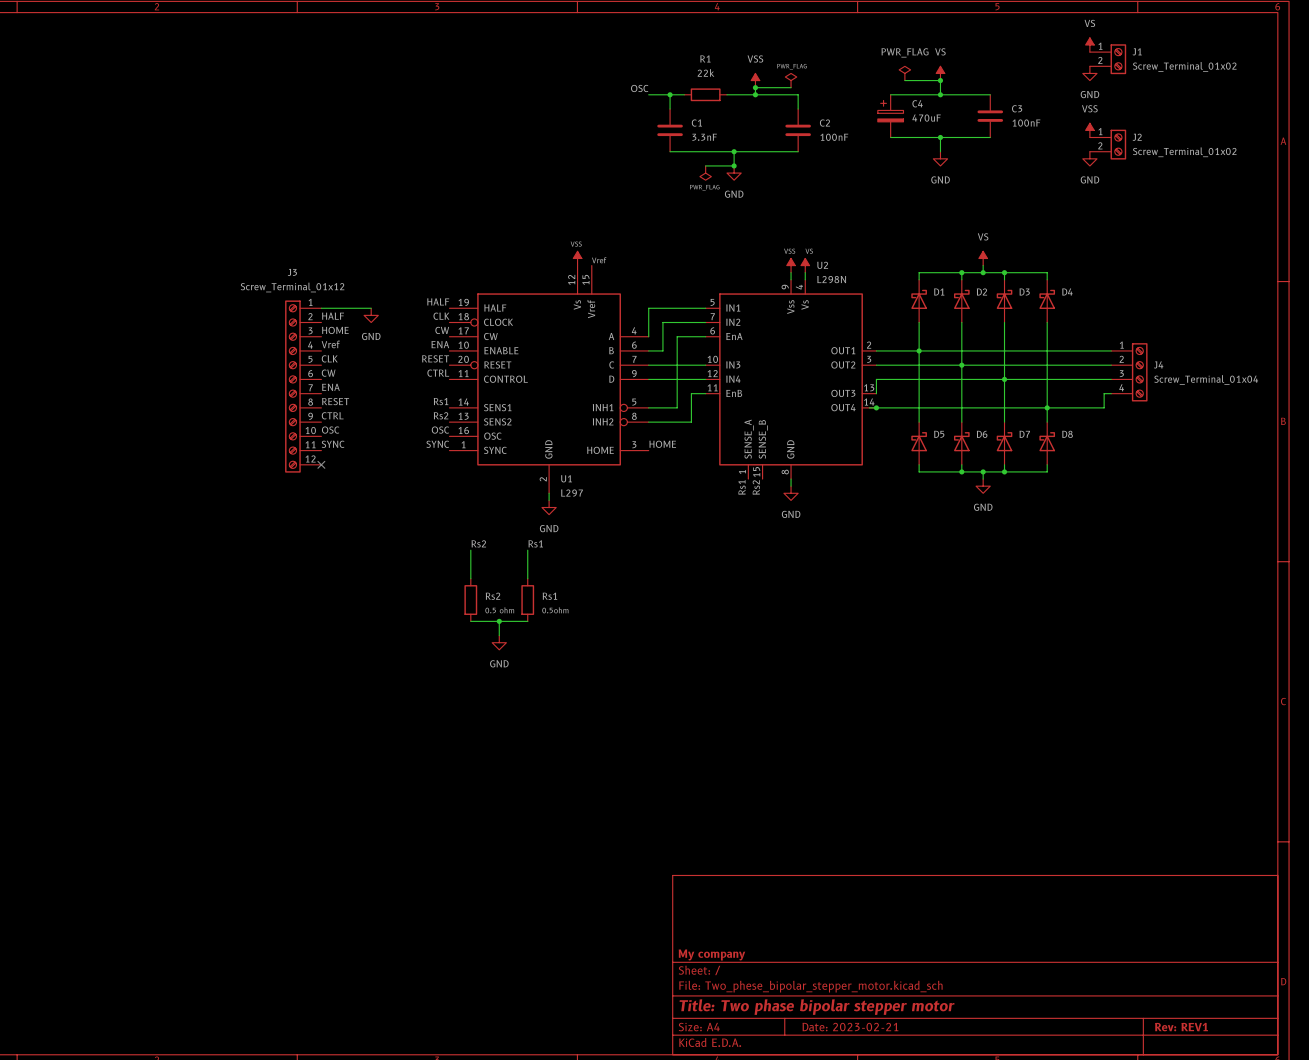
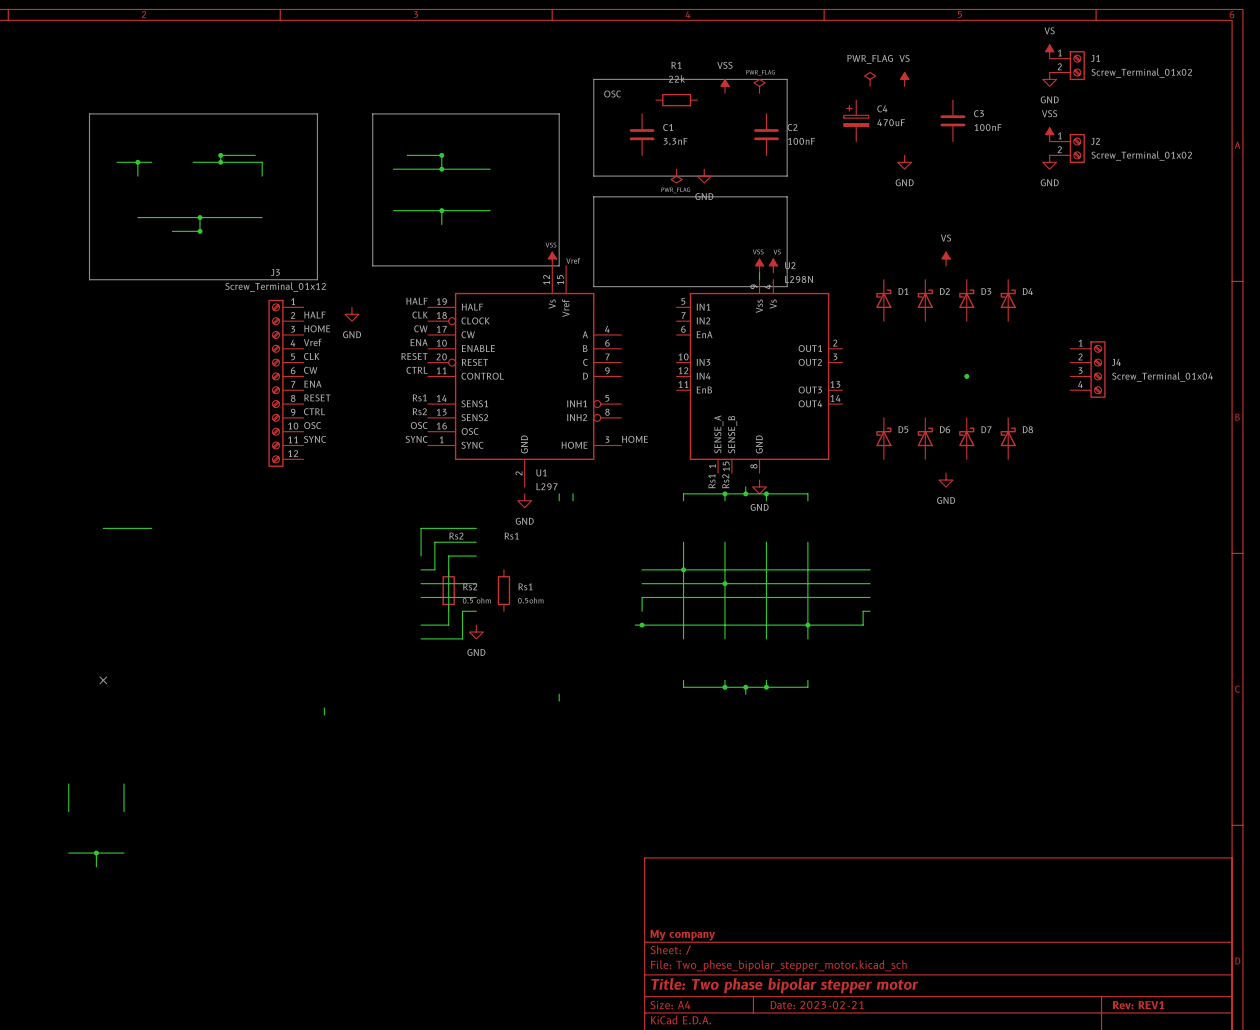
line: none -> (593, 79) (787, 79) (787, 176) (593, 176) (593, 79)
wire: (904, 80) (940, 80) (940, 94) -> none
junction: (940, 80) -> none
junction: (755, 87) -> none
wire: (791, 87) (755, 87) (755, 94) -> none
wire: (648, 94) (684, 94) -> none
wire: (670, 94) (670, 109) -> none
junction: (670, 94) -> none
wire: (726, 94) (798, 94) (798, 109) -> none
junction: (755, 94) -> none
wire: (890, 94) (990, 94) -> none
junction: (940, 94) -> none
line: none -> (89, 113) (317, 113) (317, 279) (89, 279) (89, 113)
line: none -> (372, 113) (559, 113) (559, 265) (372, 265) (372, 113)
wire: (890, 137) (990, 137) -> none
wire: (940, 137) (940, 151) -> none
junction: (940, 137) -> none
junction: none -> (220, 155)
wire: none -> (255, 155) (220, 155) (220, 162)
wire: none -> (407, 155) (441, 155) (441, 169)
junction: none -> (441, 155)
wire: (670, 151) (798, 151) -> none
wire: (734, 151) (734, 165) (705, 165) -> none
junction: (734, 151) -> none
wire: none -> (117, 162) (151, 162)
wire: none -> (137, 162) (137, 176)
junction: none -> (137, 162)
wire: none -> (193, 162) (262, 162) (262, 176)
junction: none -> (220, 162)
wire: none -> (393, 169) (490, 169)
junction: none -> (441, 169)
junction: (734, 165) -> none
line: none -> (593, 196) (593, 286) (787, 286) (787, 196) (593, 196)
wire: none -> (393, 210) (490, 210)
wire: none -> (441, 210) (441, 224)
junction: none -> (441, 210)
wire: none -> (137, 217) (262, 217)
wire: none -> (200, 217) (200, 231) (172, 231)
junction: none -> (200, 217)
junction: none -> (200, 231)
wire: (983, 265) (983, 272) -> none
wire: (805, 272) (805, 279) -> none
wire: (961, 272) (961, 279) -> none
junction: (961, 272) -> none
junction: (983, 272) -> none
wire: (1004, 272) (1004, 279) -> none
junction: (1004, 272) -> none
wire: (919, 279) (919, 272) (1047, 272) (1047, 279) -> none
wire: (321, 308) (371, 308) -> none
wire: (705, 308) (648, 308) (648, 336) -> none
wire: (705, 322) (662, 322) (662, 350) (648, 350) -> none
wire: (919, 322) (919, 422) -> none
wire: (961, 322) (961, 422) -> none
wire: (1004, 322) (1004, 422) -> none
wire: (1047, 322) (1047, 422) -> none
wire: (705, 336) (677, 336) (677, 407) (648, 407) -> none
wire: (876, 350) (1111, 350) -> none
junction: (919, 350) -> none
wire: (648, 365) (705, 365) -> none
wire: (876, 365) (1111, 365) -> none
junction: (961, 365) -> none
wire: (648, 379) (705, 379) -> none
wire: (1111, 379) (876, 379) (876, 393) -> none
wire: (705, 393) (691, 393) (691, 422) (648, 422) -> none
wire: (1111, 393) (1104, 393) (1104, 407) (869, 407) -> none
junction: (876, 407) -> none
junction: (1047, 407) -> none
no-connect mark: (321, 464) -> none
wire: (919, 464) (919, 471) (1047, 471) (1047, 464) -> none
wire: (961, 464) (961, 471) -> none
wire: (1004, 464) (1004, 471) -> none
junction: (961, 471) -> none
wire: (983, 471) (983, 479) -> none
junction: (983, 471) -> none
junction: (1004, 471) -> none
wire: (791, 479) (791, 486) -> (745, 486) (745, 493)
wire: (549, 493) (549, 500) -> (559, 493) (559, 500)
wire: none -> (573, 493) (573, 500)
wire: none -> (724, 493) (724, 500)
junction: none -> (724, 493)
junction: none -> (745, 493)
wire: none -> (766, 493) (766, 500)
junction: none -> (766, 493)
wire: none -> (683, 500) (683, 493) (807, 493) (807, 500)
wire: none -> (103, 528) (151, 528)
wire: none -> (476, 528) (421, 528) (421, 556)
wire: (470, 550) (470, 564) -> (476, 556) (448, 556)
wire: none -> (476, 542) (434, 542) (434, 569) (421, 569)
wire: (527, 550) (527, 578) -> none
wire: none -> (683, 542) (683, 638)
wire: none -> (724, 542) (724, 638)
wire: none -> (766, 542) (766, 638)
wire: none -> (807, 542) (807, 638)
wire: none -> (448, 569) (448, 625) (421, 625)
wire: none -> (642, 569) (870, 569)
junction: none -> (683, 569)
wire: none -> (421, 583) (476, 583)
wire: none -> (642, 583) (870, 583)
junction: none -> (724, 583)
wire: none -> (421, 597) (476, 597)
wire: none -> (870, 597) (642, 597) (642, 611)
wire: (470, 621) (485, 621) -> (421, 638) (462, 638) (462, 611)
junction: (499, 621) -> none
wire: (527, 621) (499, 621) (499, 635) -> none
wire: none -> (870, 611) (863, 611) (863, 625) (635, 625)
junction: none -> (642, 625)
junction: none -> (807, 625)
no-connect mark: none -> (103, 680)
wire: none -> (683, 680) (683, 687) (807, 687) (807, 680)
wire: none -> (724, 680) (724, 687)
wire: none -> (766, 680) (766, 687)
junction: none -> (724, 687)
wire: none -> (745, 687) (745, 694)
junction: none -> (745, 687)
junction: none -> (766, 687)
wire: none -> (559, 694) (559, 701)
wire: none -> (324, 707) (324, 714)
wire: none -> (68, 783) (68, 811)
wire: none -> (124, 783) (124, 811)
wire: none -> (68, 853) (124, 853)
wire: none -> (96, 853) (96, 866)
junction: none -> (96, 853)

